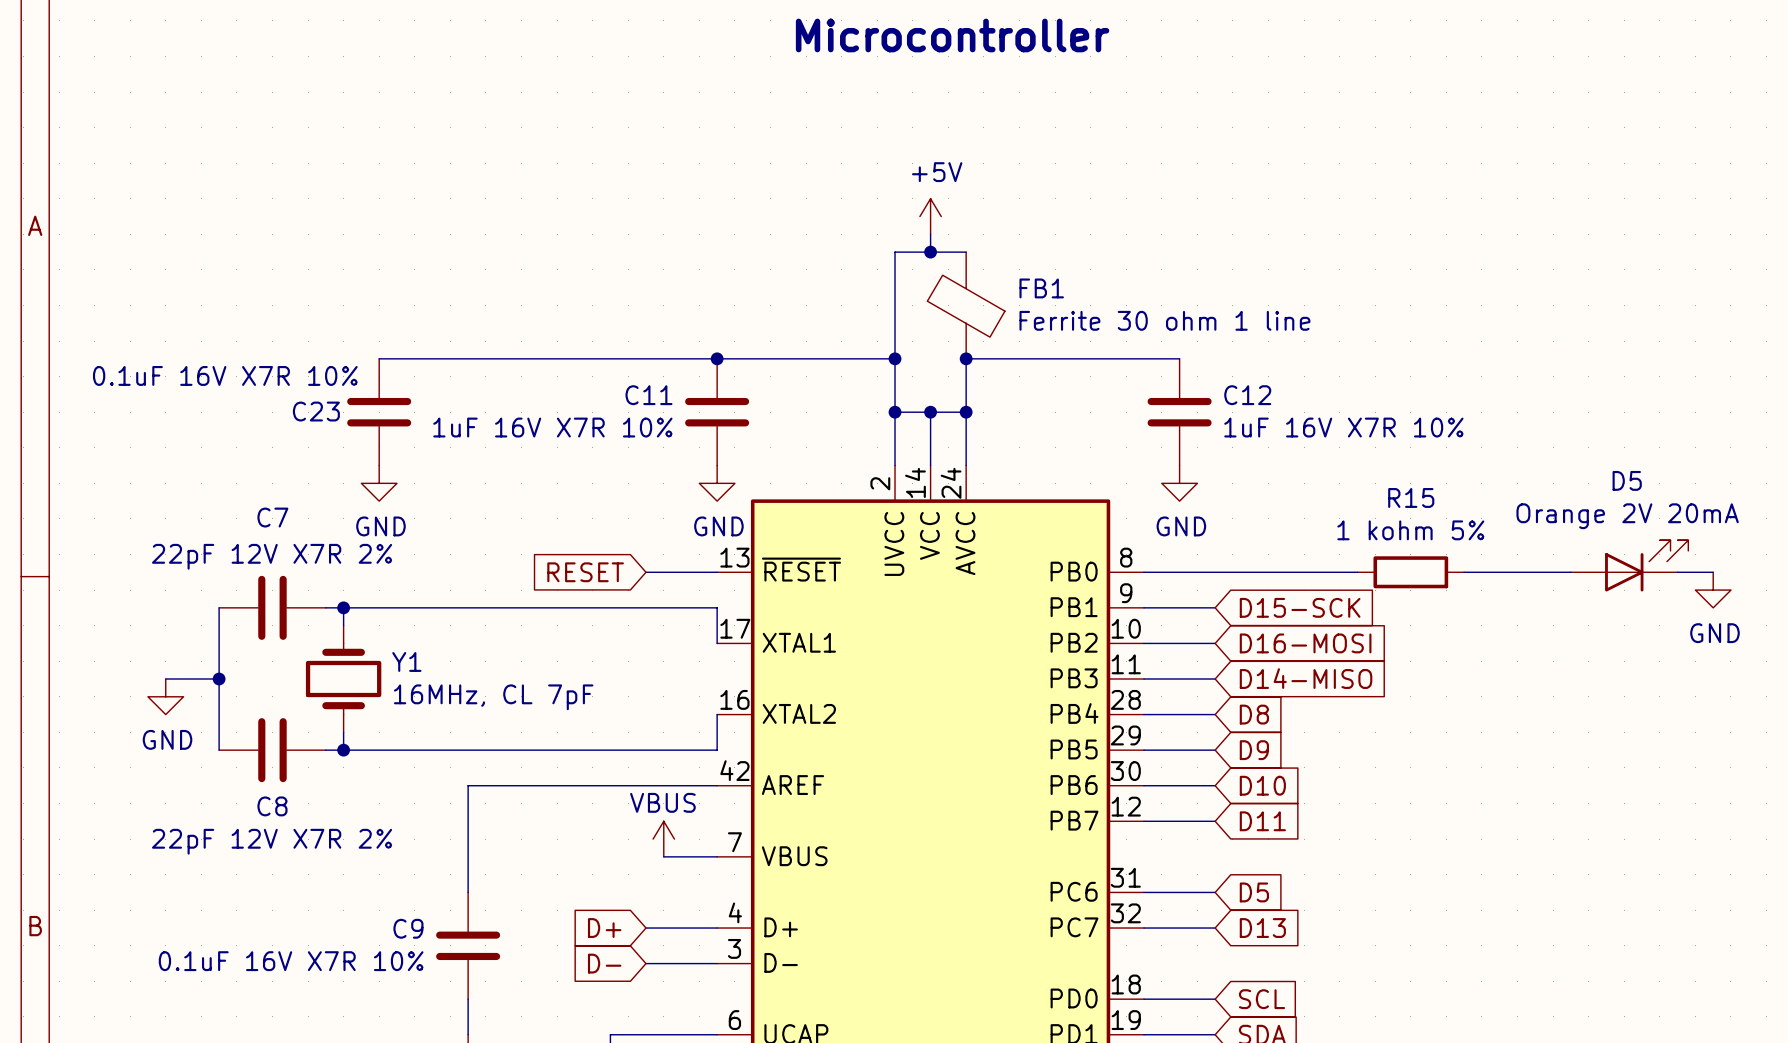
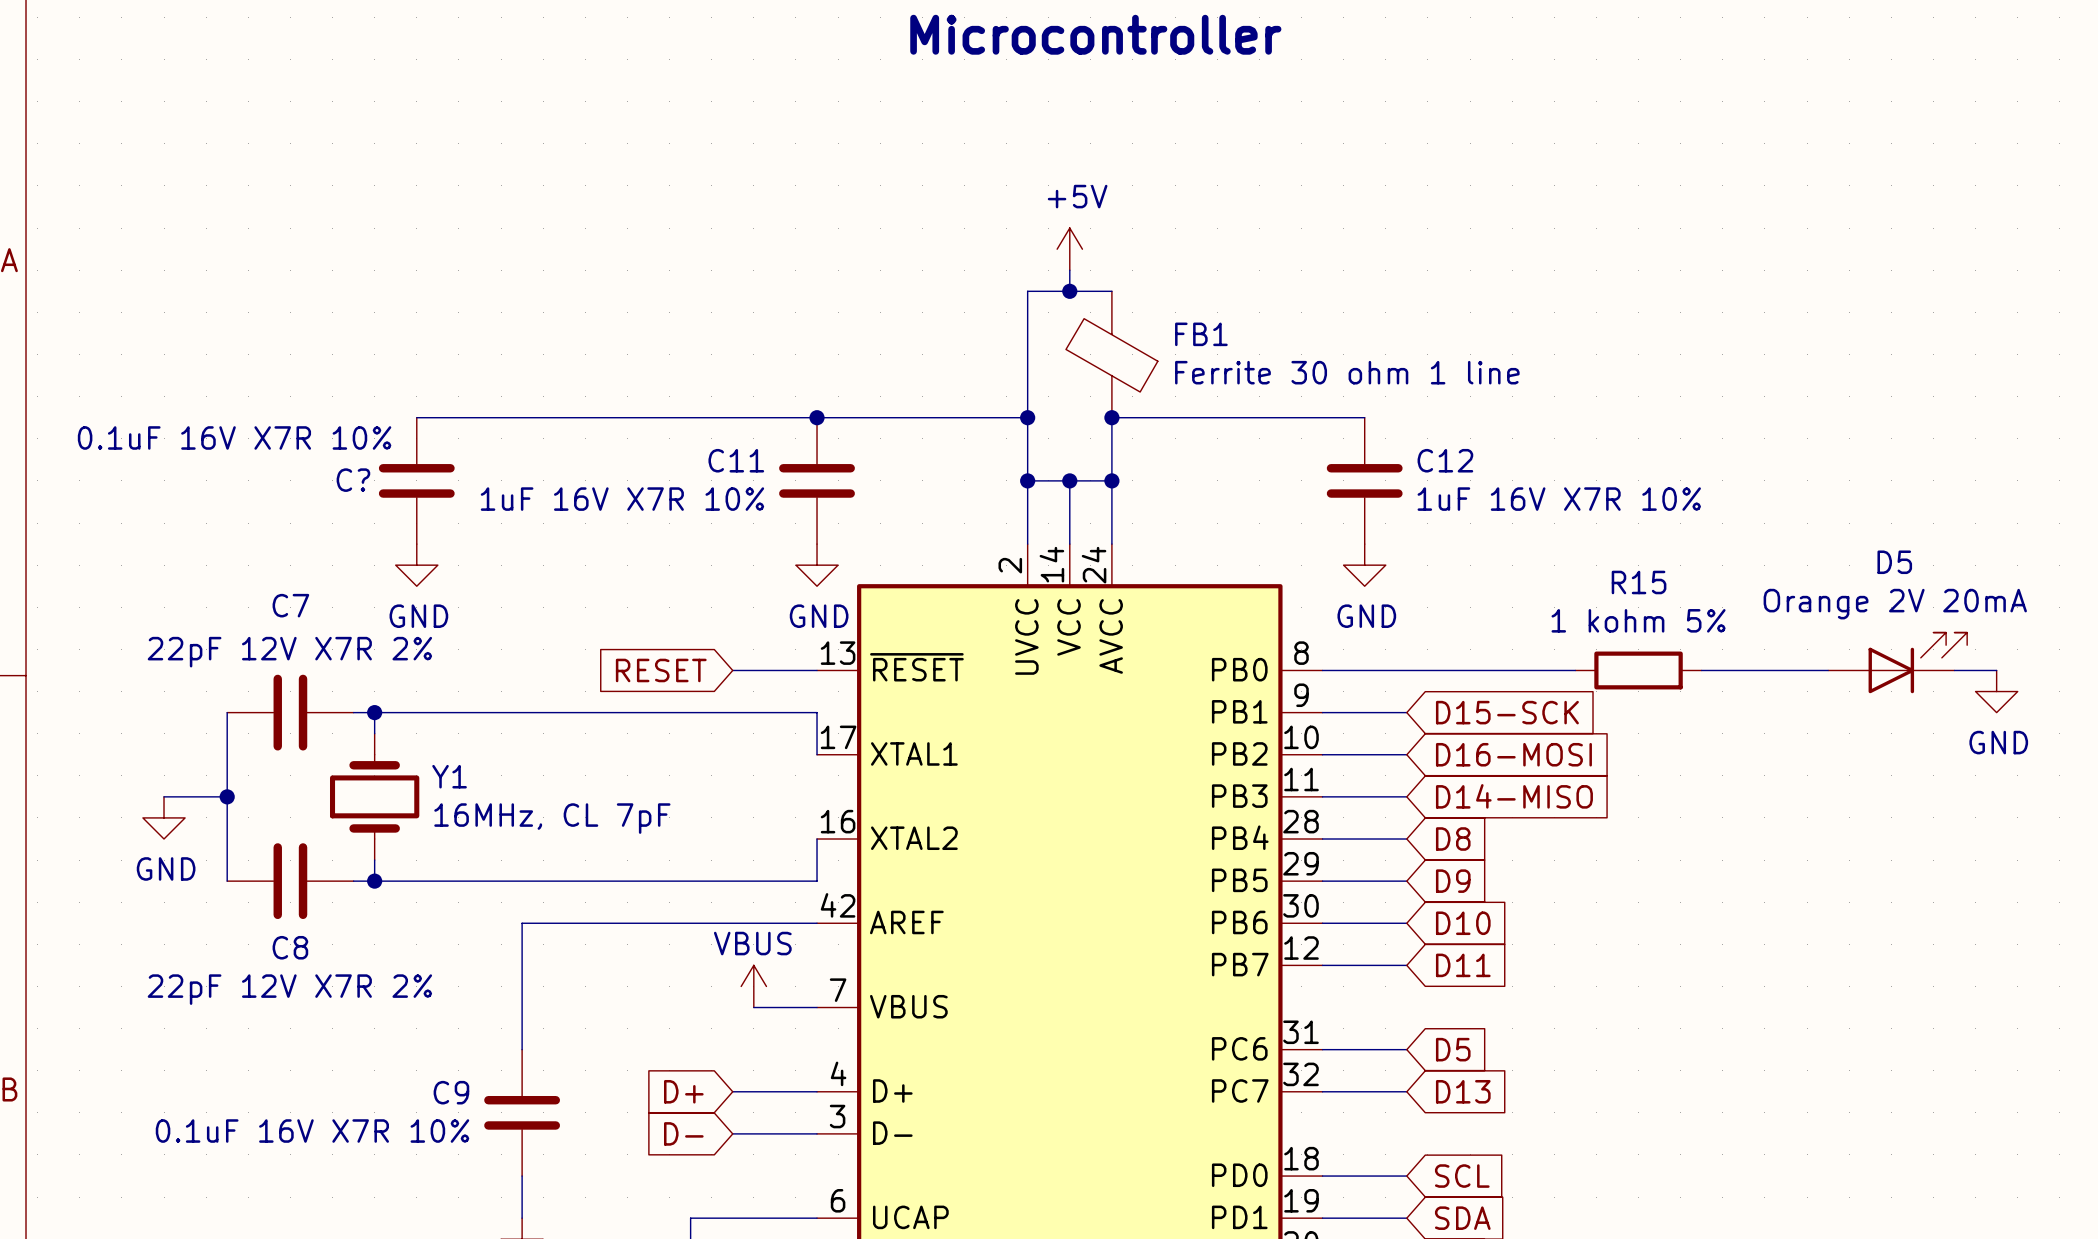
C23 name: C23 (316, 411) -> C? (353, 480)

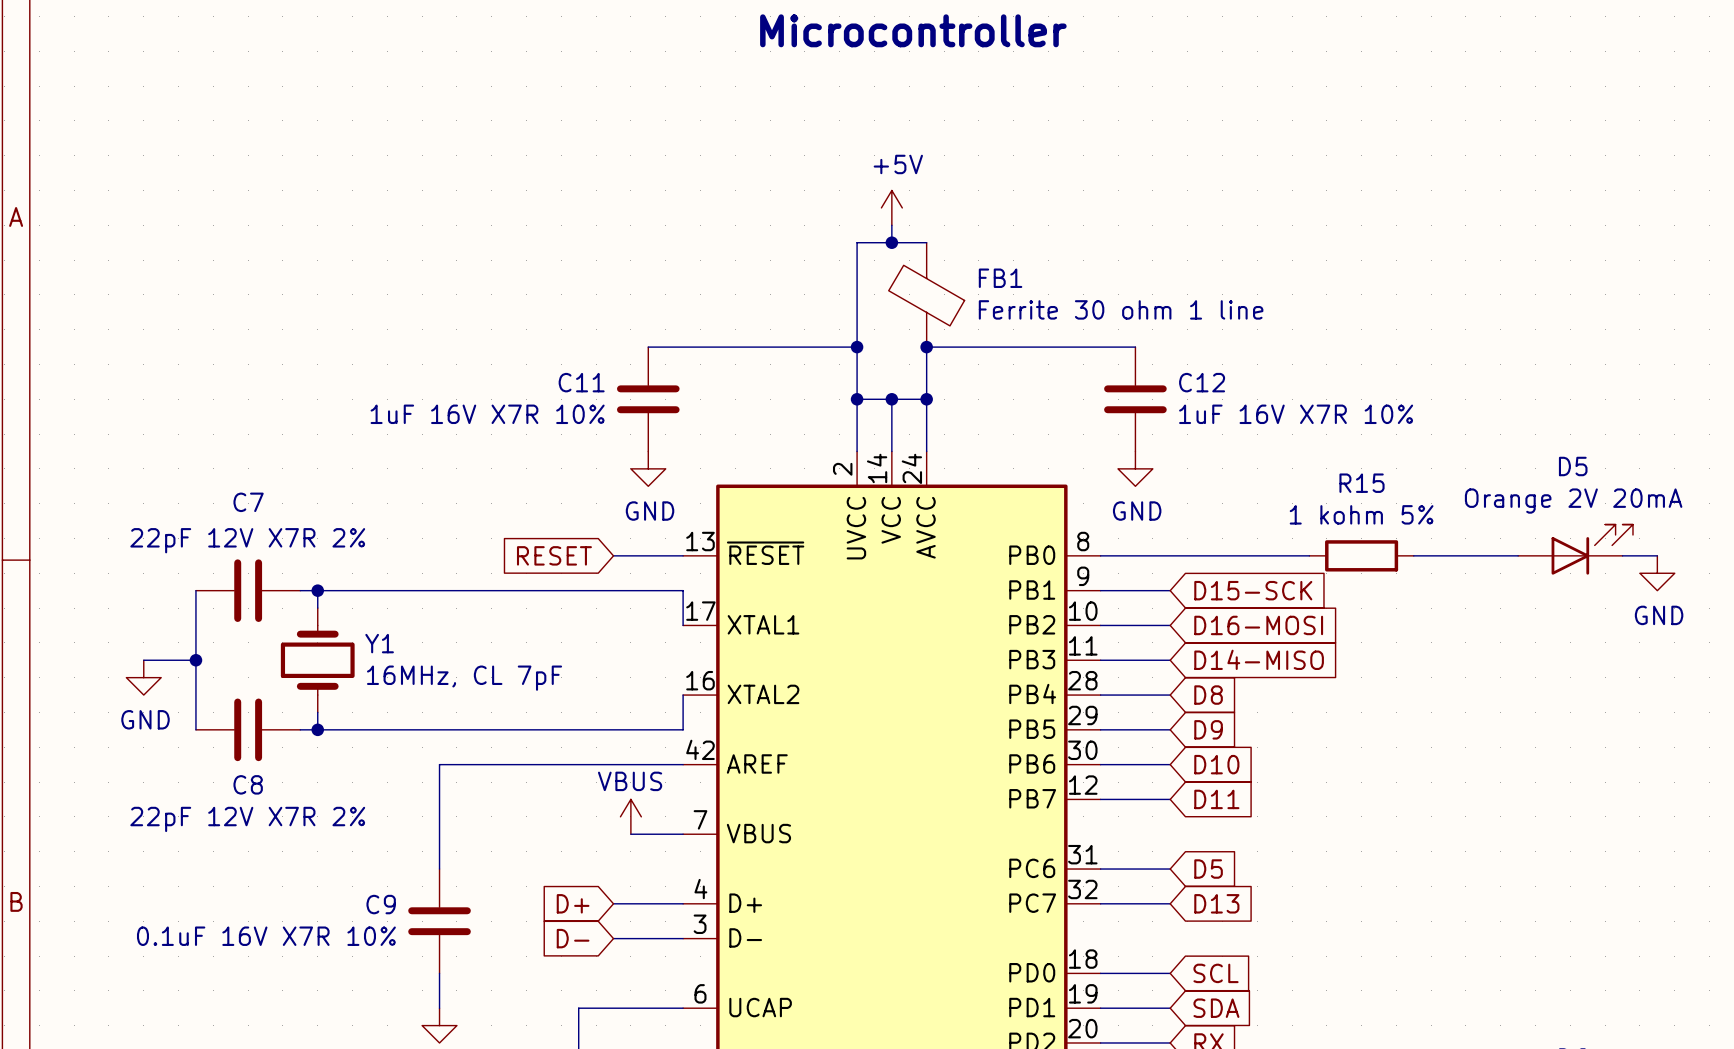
wire: (416, 417) (774, 417) -> none
junction: (817, 417) -> none
C?: 0.1uF 16V X7R 10% (416, 480) -> none
C11 position: (817, 480) -> (648, 399)
power symbol: GND (416, 565) -> none
power symbol position: GND (817, 565) -> GND (648, 468)

